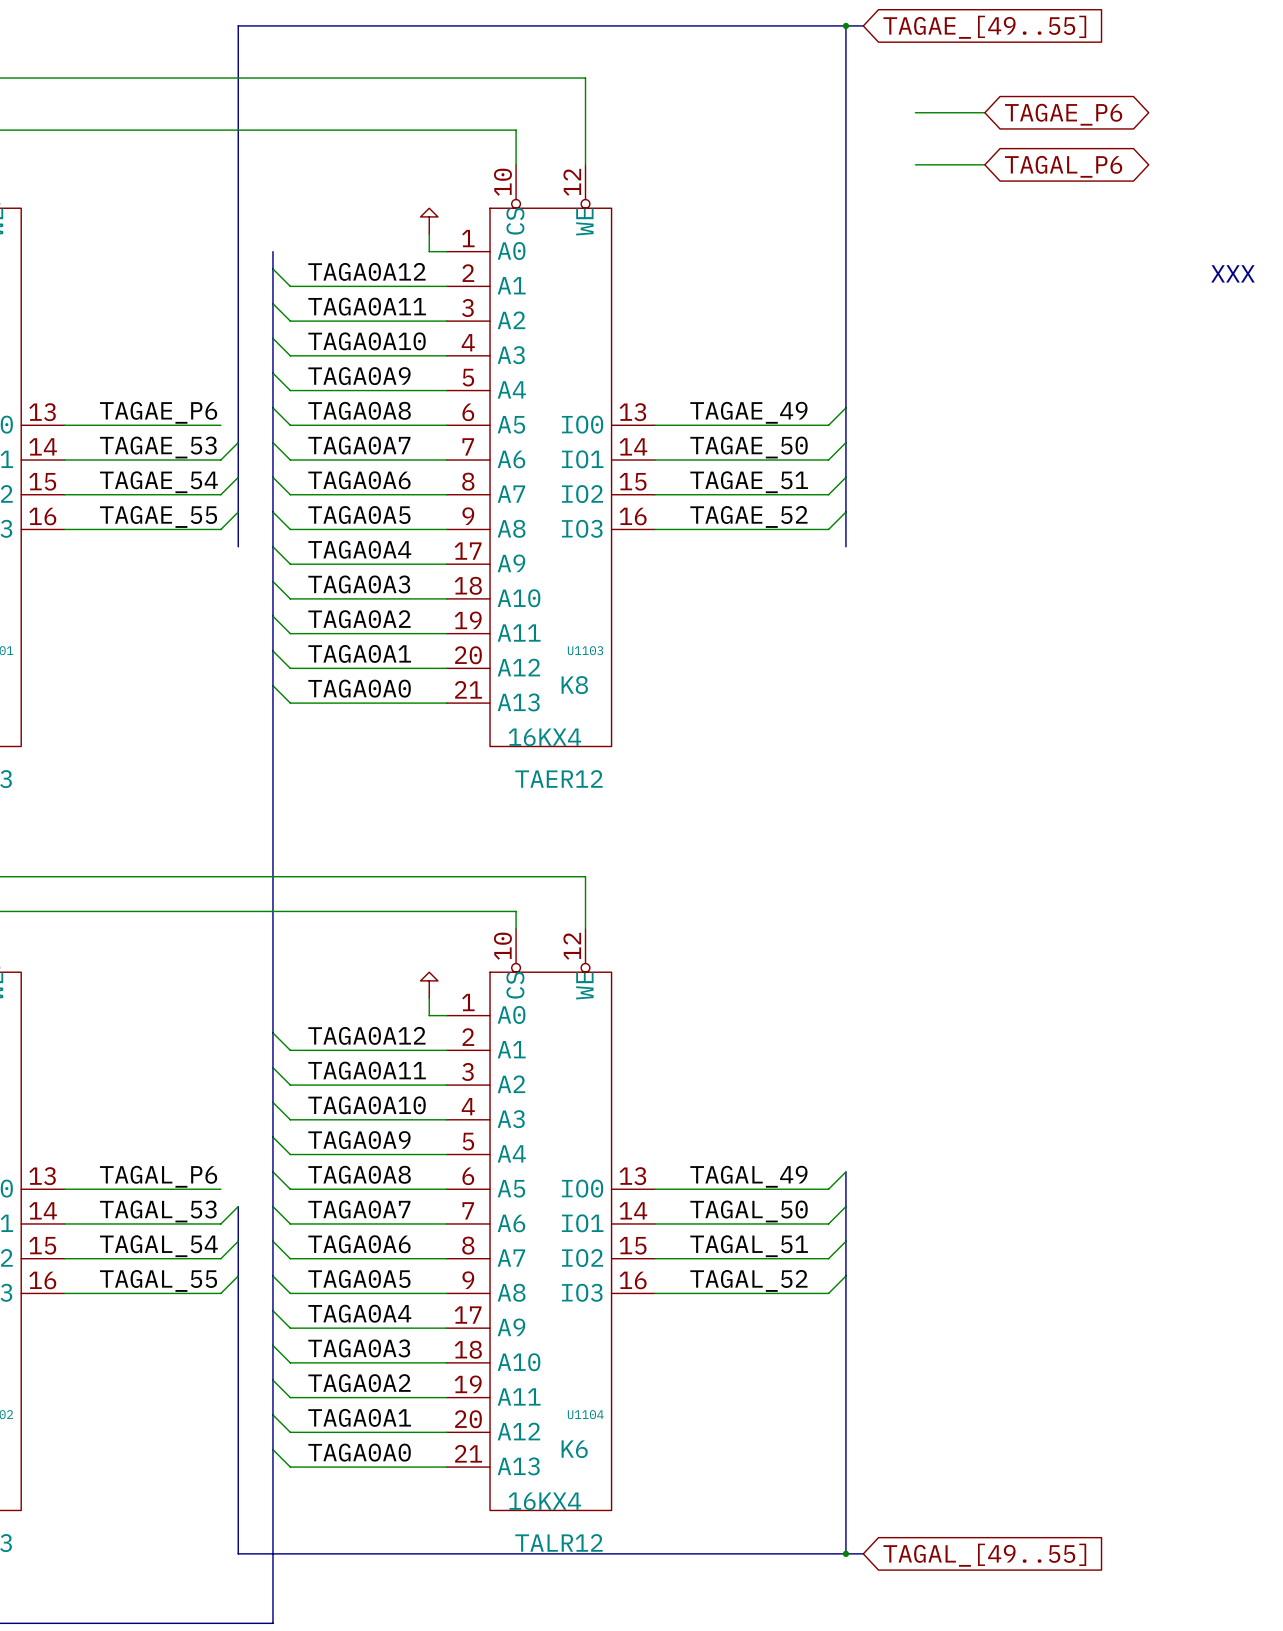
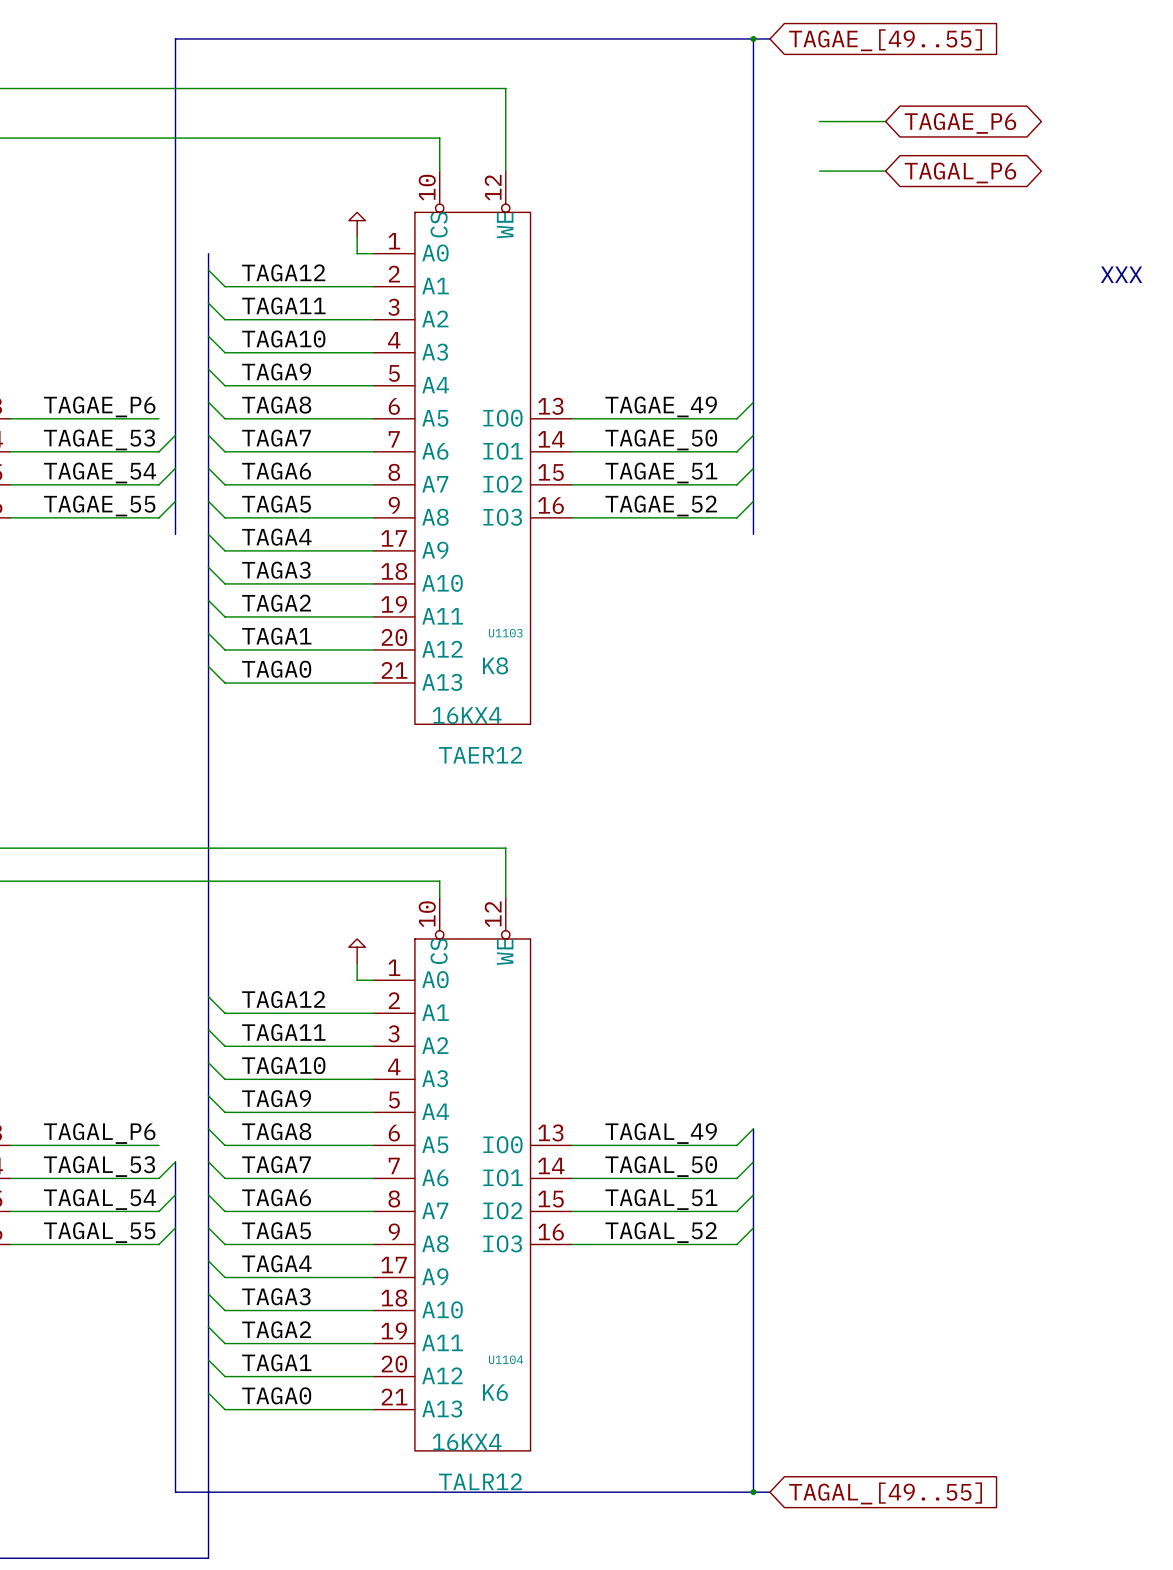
label: TAGA0A12 (366, 271) -> TAGA12 (283, 272)
label: TAGA0A11 (367, 306) -> TAGA11 (283, 305)
label: TAGA0A10 (367, 341) -> TAGA10 (283, 338)
label: TAGA0A9 (359, 376) -> TAGA9 (276, 372)
label: TAGA0A8 (359, 410) -> TAGA8 (276, 405)
label: TAGA0A7 (359, 445) -> TAGA7 (276, 438)
label: TAGA0A6 (359, 480) -> TAGA6 (276, 471)
label: TAGA0A5 (359, 515) -> TAGA5 (276, 504)
label: TAGA0A4 (359, 549) -> TAGA4 (276, 537)
label: TAGA0A3 (359, 584) -> TAGA3 (276, 570)
label: TAGA0A2 (359, 619) -> TAGA2 (276, 603)
label: TAGA0A1 (359, 653) -> TAGA1 (276, 636)
label: TAGA0A0 (359, 688) -> TAGA0 (276, 669)
label: TAGA0A12 (366, 1035) -> TAGA12 (283, 999)
label: TAGA0A11 (367, 1070) -> TAGA11 (283, 1032)
label: TAGA0A10 (367, 1105) -> TAGA10 (283, 1065)
label: TAGA0A9 (359, 1140) -> TAGA9 (276, 1098)
label: TAGA0A8 (359, 1174) -> TAGA8 (276, 1131)
label: TAGA0A7 (359, 1209) -> TAGA7 (276, 1164)
label: TAGA0A6 (359, 1244) -> TAGA6 (276, 1197)
label: TAGA0A5 (359, 1278) -> TAGA5 (276, 1230)
label: TAGA0A4 (359, 1313) -> TAGA4 (276, 1263)
label: TAGA0A3 (359, 1348) -> TAGA3 (276, 1296)
label: TAGA0A2 (359, 1383) -> TAGA2 (276, 1329)
label: TAGA0A1 (359, 1417) -> TAGA1 (276, 1362)
label: TAGA0A0 (359, 1452) -> TAGA0 (276, 1395)

